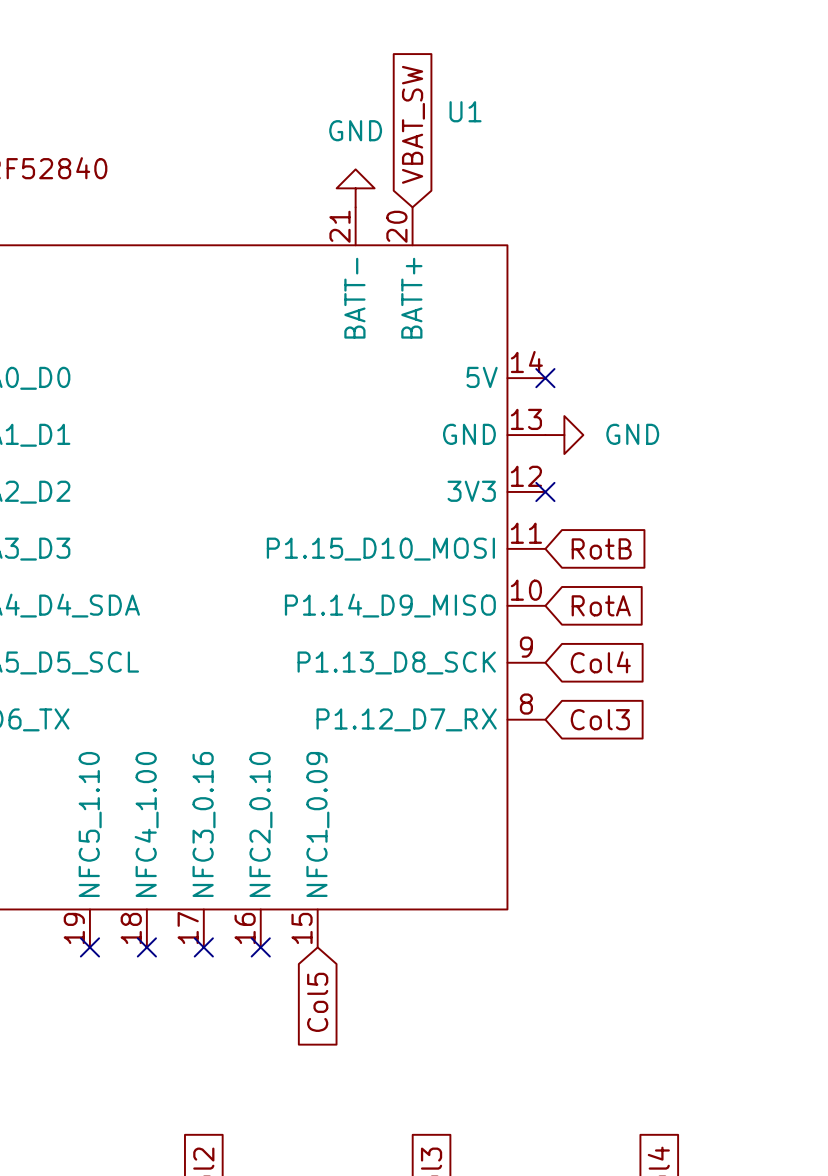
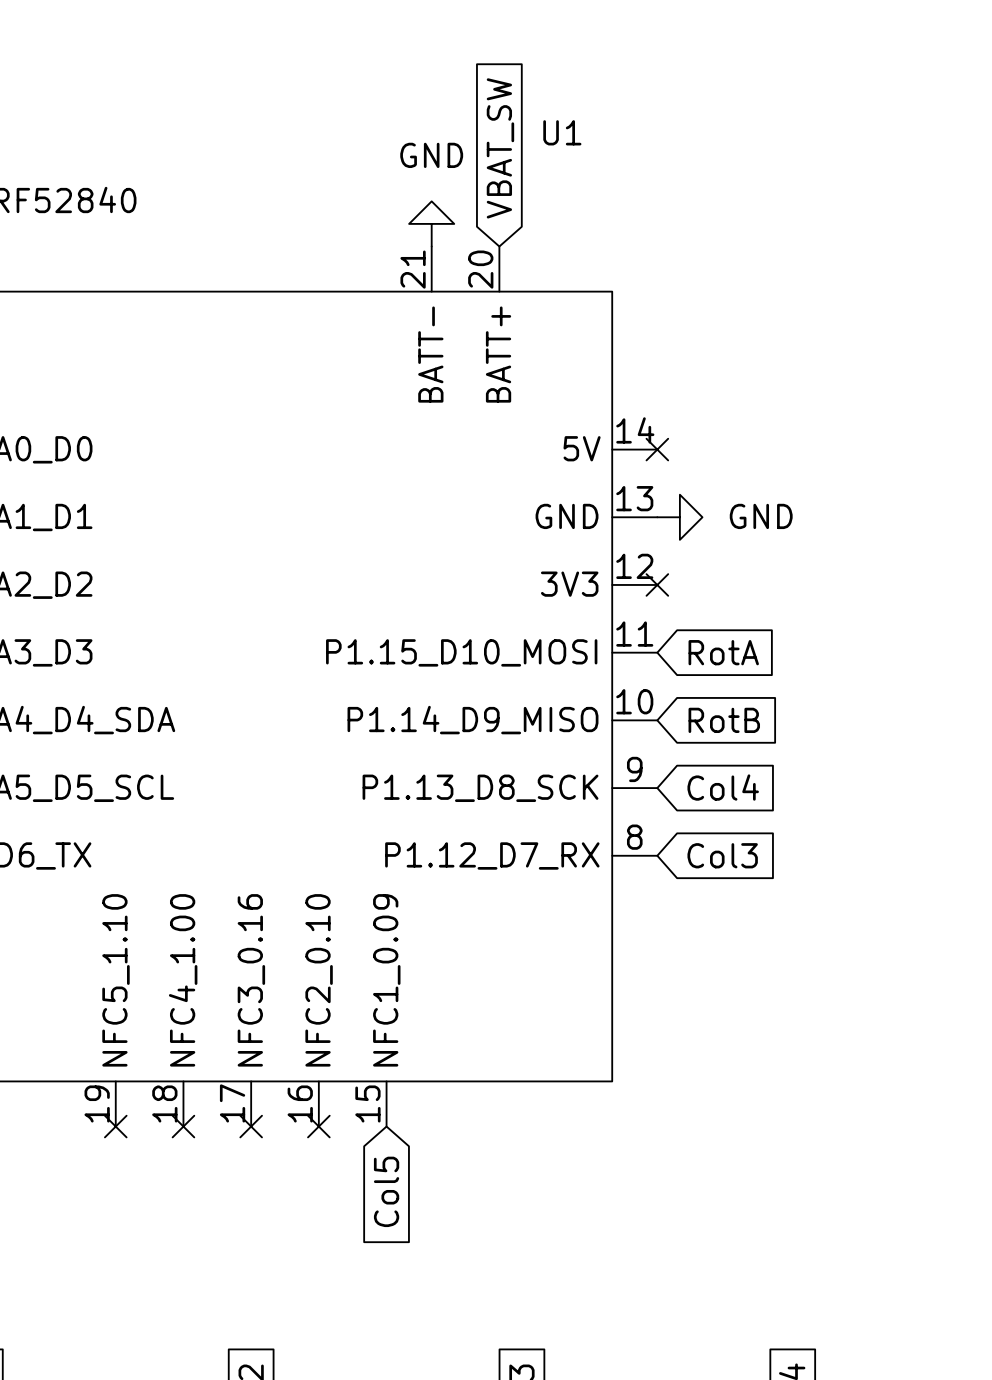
global label: RotB (601, 548) -> RotA (723, 652)
global label: RotA (601, 605) -> RotB (724, 720)

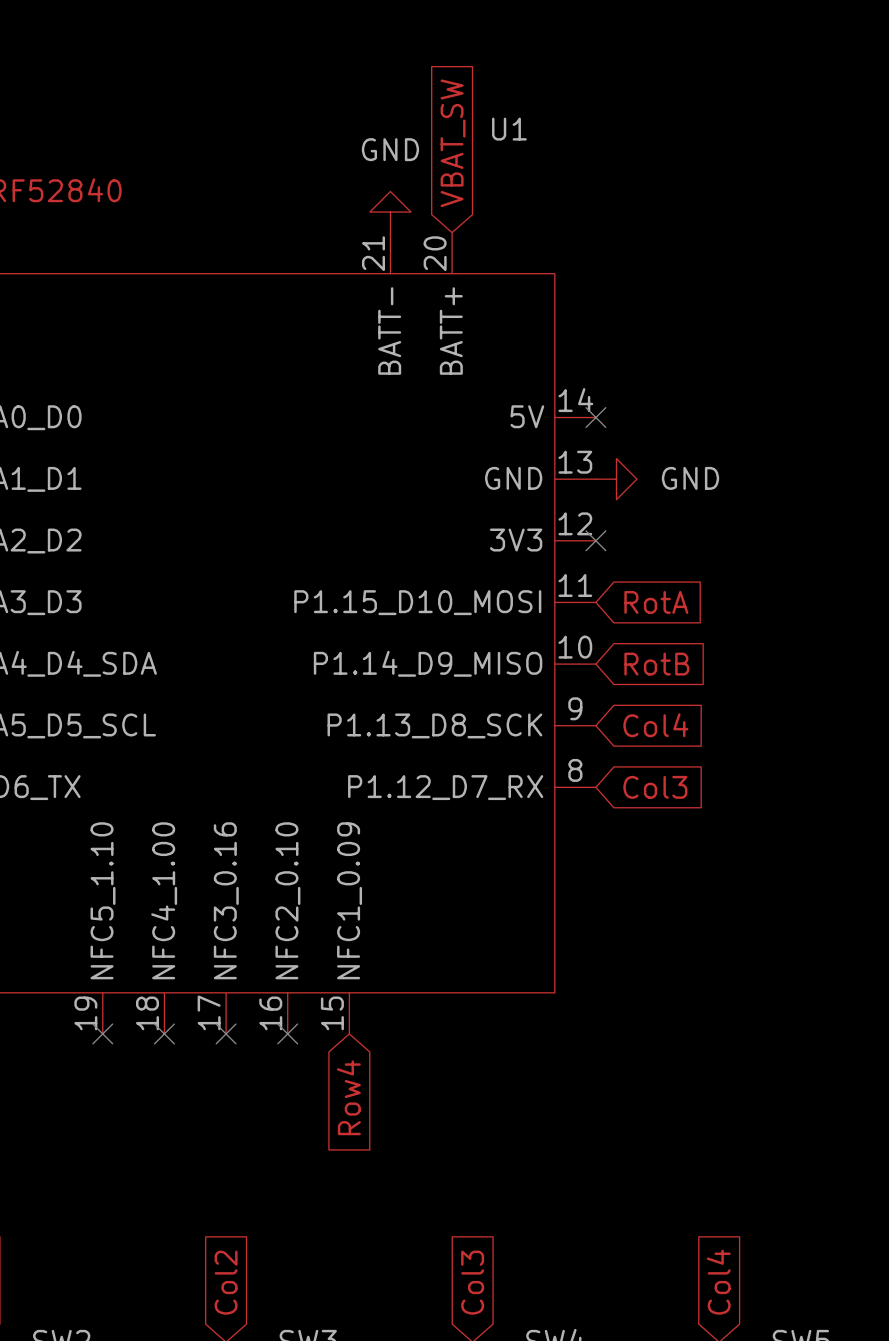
global label: Col5 (386, 1191) -> Row4 (348, 1097)

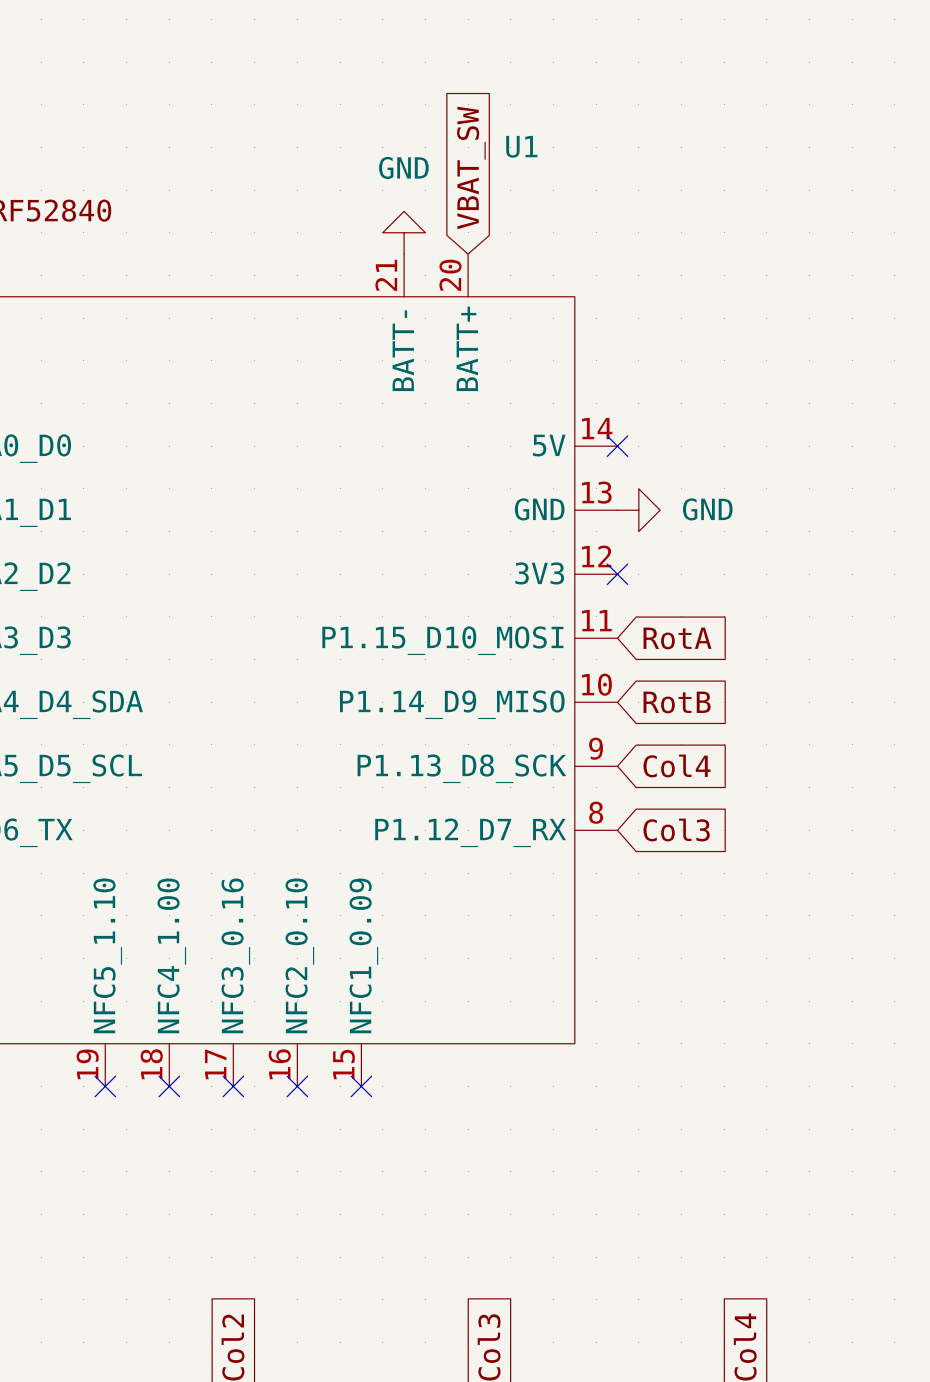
no-connect mark: none -> (361, 1086)
global label: Row4 (348, 1097) -> none

